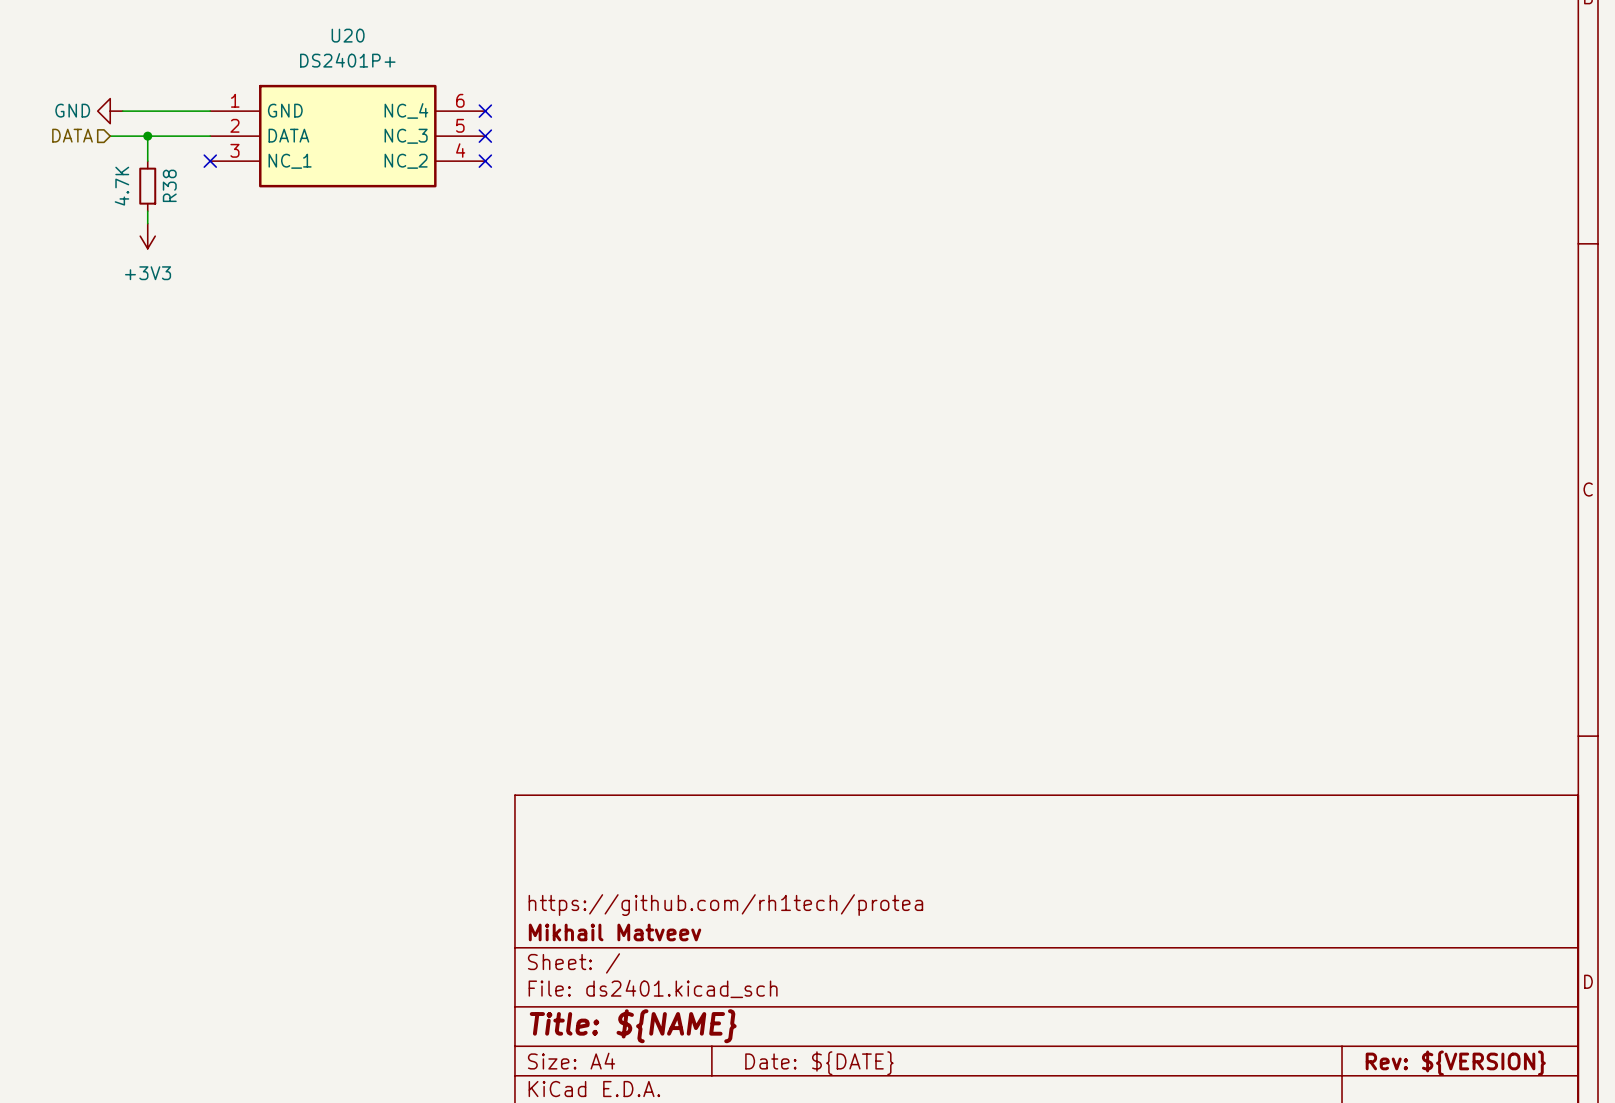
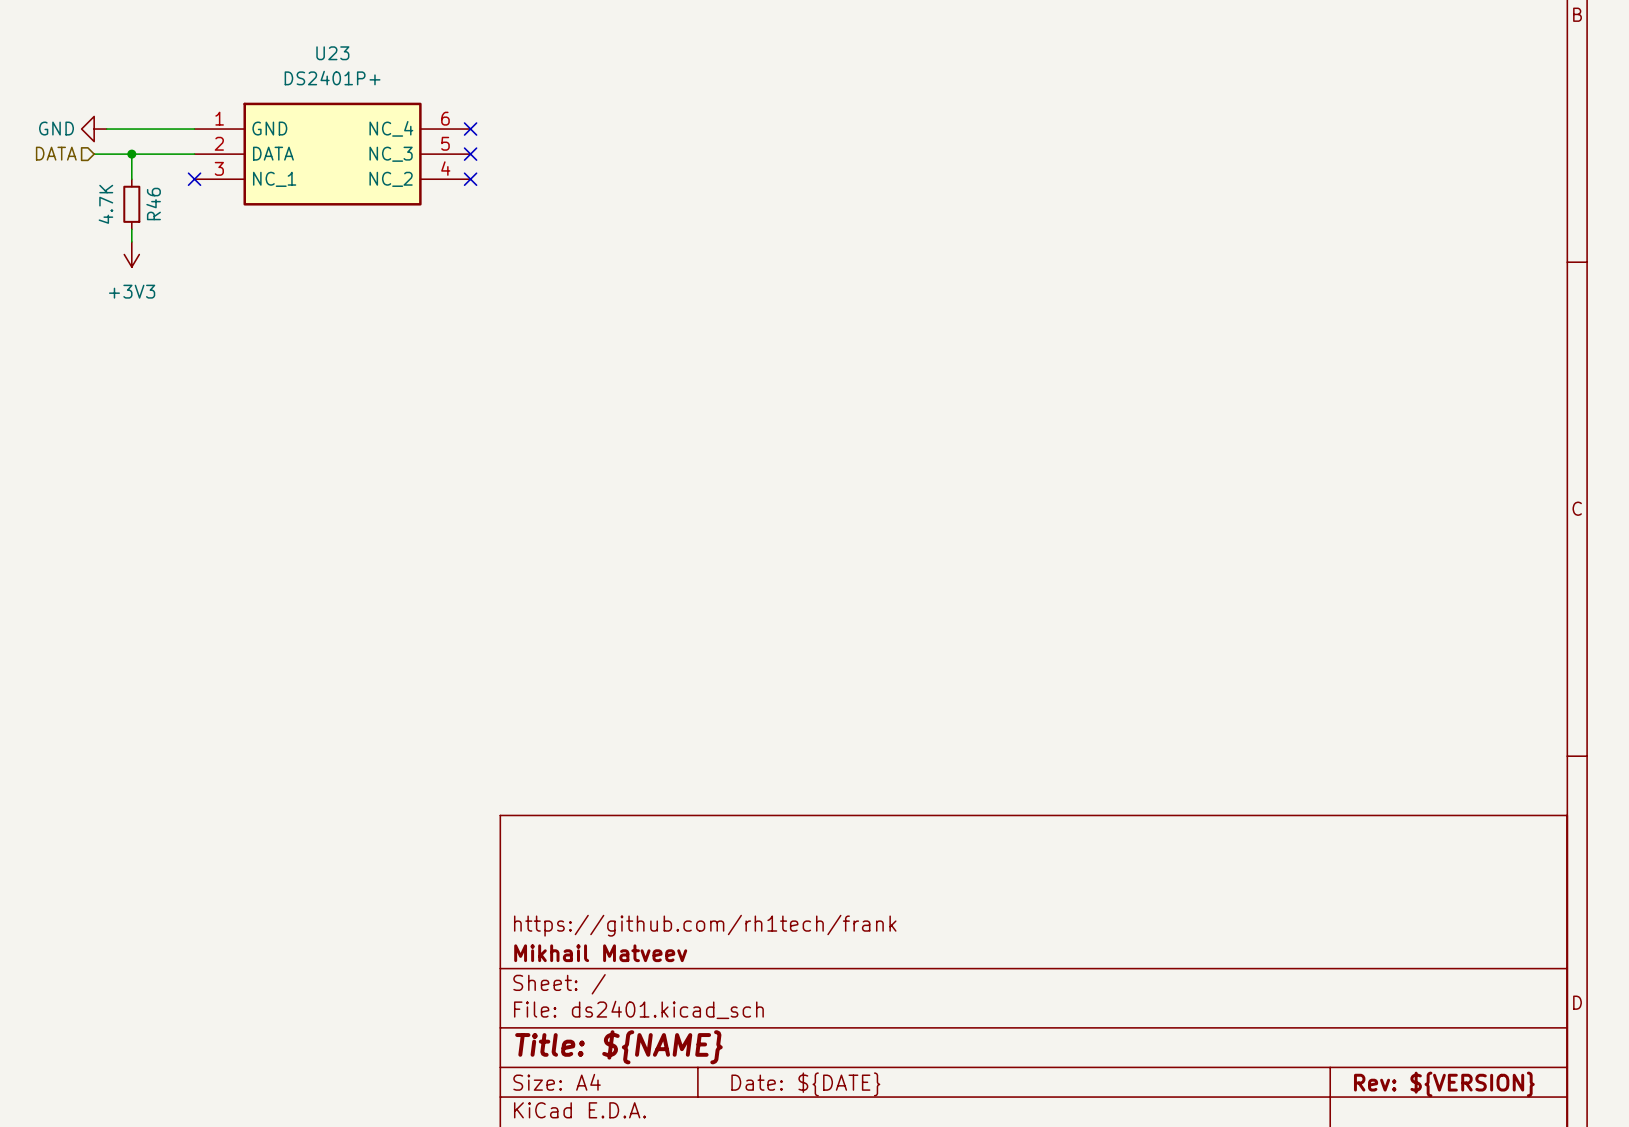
U20 name: U20 (348, 35) -> U23 (332, 53)
R38 name: R38 (169, 185) -> R46 (153, 204)
title block: https://github.com/rh1tech/protea (725, 905) -> https://github.com/rh1tech/frank (705, 925)

